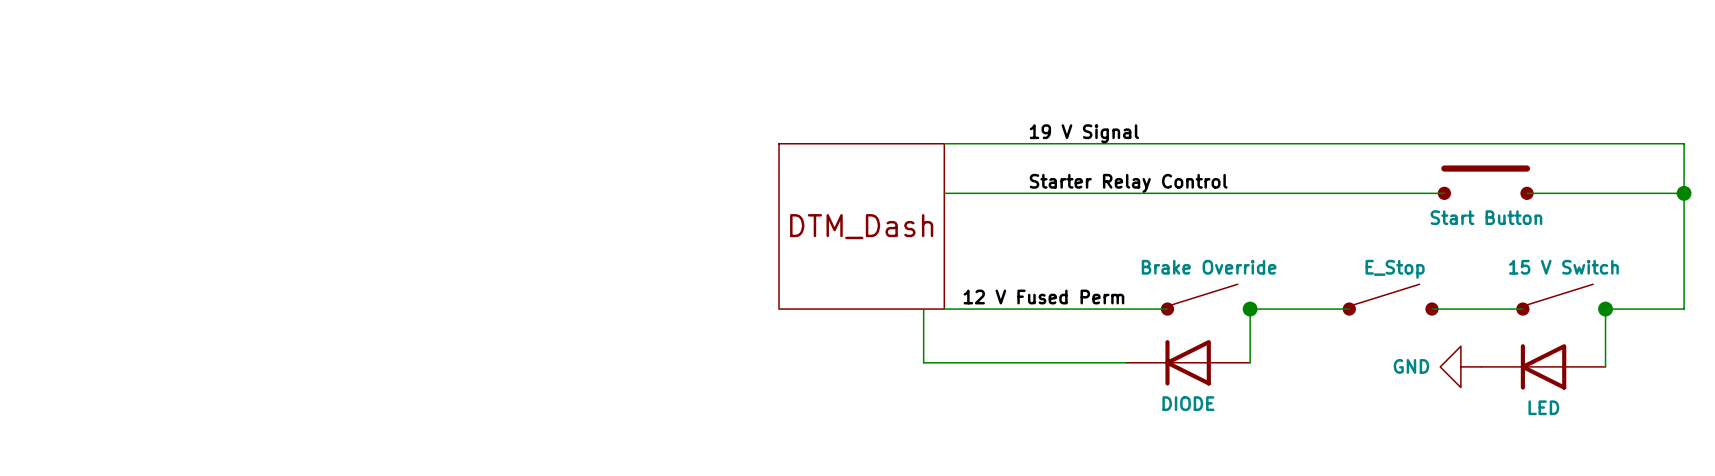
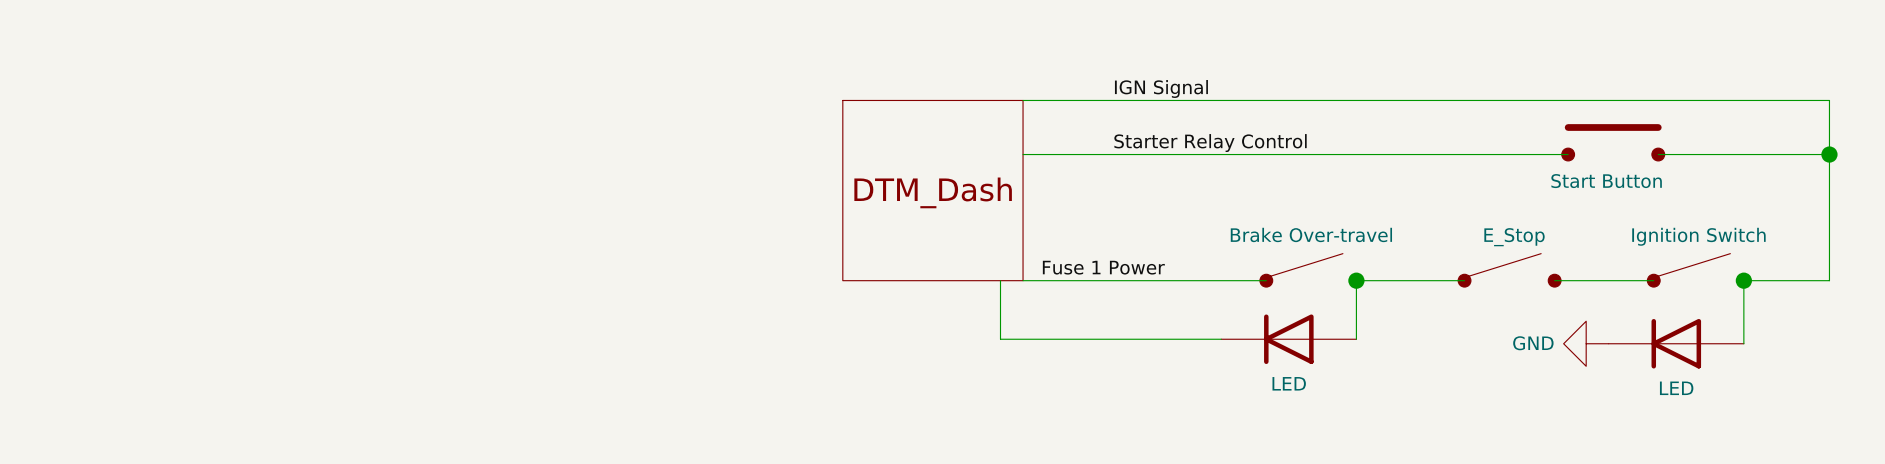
label: 19 V Signal (1084, 133) -> IGN Signal (1161, 88)
part value: Brake Override (1209, 267) -> Brake Over-travel (1311, 234)
part value: 15 V Switch (1563, 267) -> Ignition Switch (1698, 236)
label: 12 V Fused Perm (1043, 297) -> Fuse 1 Power (1103, 267)
part value: DIODE (1188, 403) -> LED (1289, 383)

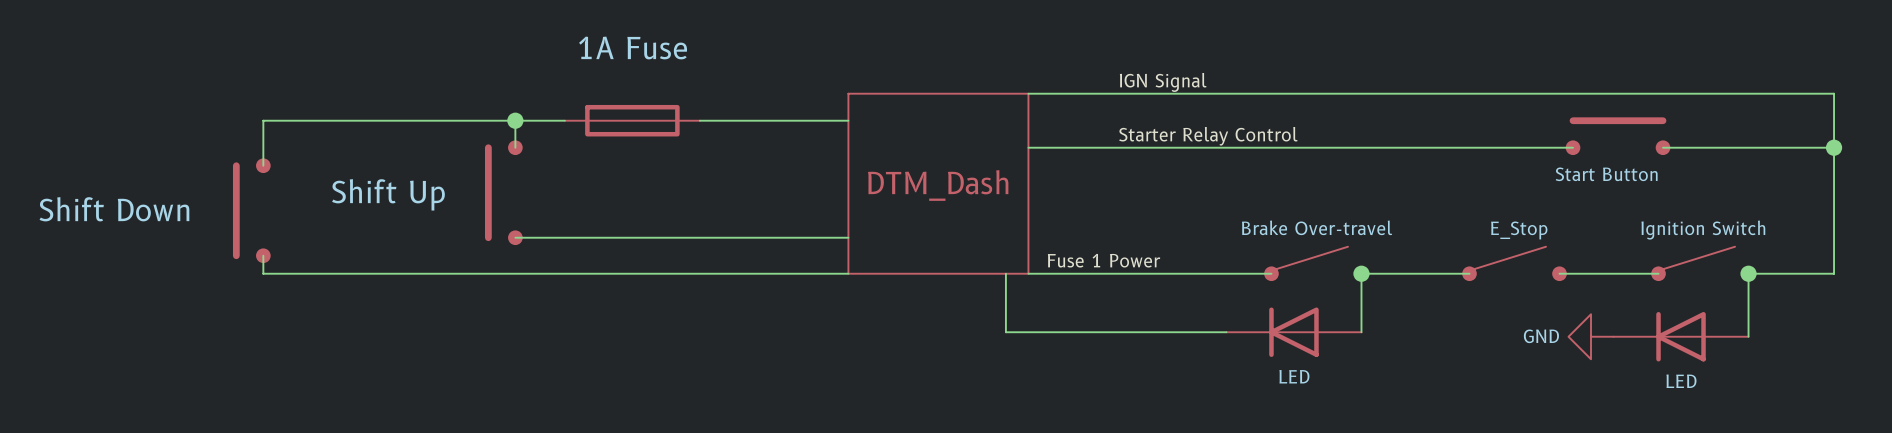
wire: none -> (515, 120) (515, 147)
junction: none -> (515, 120)
wire: none -> (564, 120) (263, 120) (263, 165)
part: none -> 1A Fuse (632, 120)
wire: none -> (699, 120) (848, 120)
part: none -> Shift Up (503, 192)
part: none -> Shift Down (251, 210)
wire: none -> (515, 237) (848, 237)
wire: none -> (263, 255) (263, 273) (848, 273)

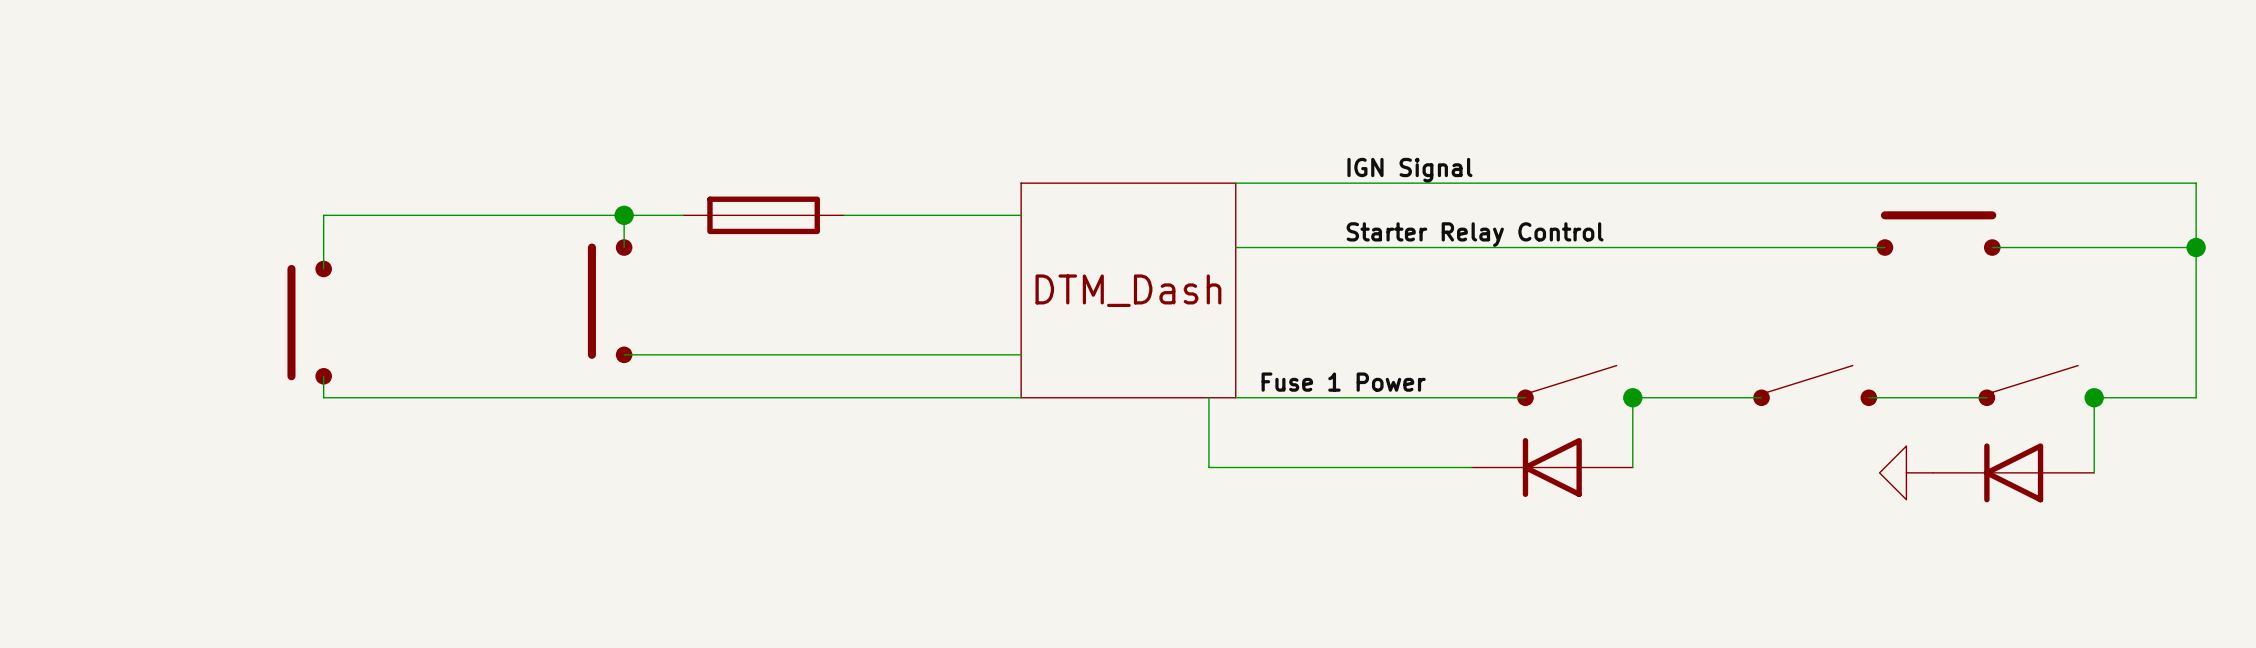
part value: 1A Fuse (633, 47) -> none
part value: Start Button (1606, 174) -> none
part value: Shift Up (388, 194) -> none
part value: Shift Down (114, 209) -> none
part value: Brake Over-travel (1317, 227) -> none
part value: E_Stop (1519, 230) -> none
part value: Ignition Switch (1703, 230) -> none
power symbol text: GND (1541, 336) -> none
part value: LED (1294, 376) -> none
part value: LED (1681, 381) -> none

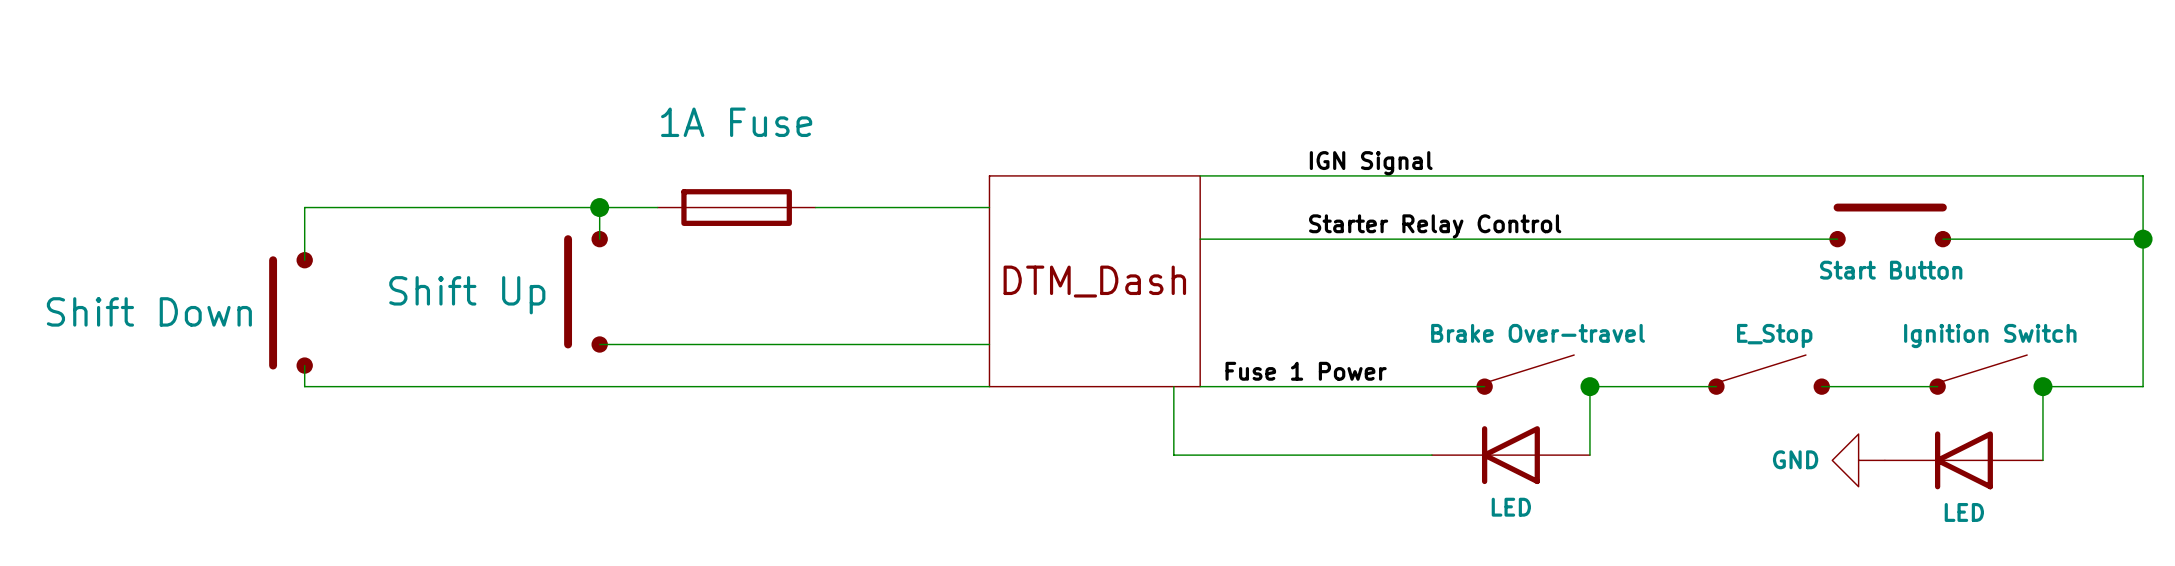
part value: none -> 1A Fuse (736, 122)
part value: none -> Start Button (1891, 270)
part value: none -> Shift Up (467, 295)
part value: none -> Shift Down (149, 311)
part value: none -> Brake Over-travel (1538, 333)
part value: none -> E_Stop (1774, 336)
part value: none -> Ignition Switch (1990, 336)
power symbol text: none -> GND (1795, 459)
part value: none -> LED (1511, 507)
part value: none -> LED (1964, 512)

